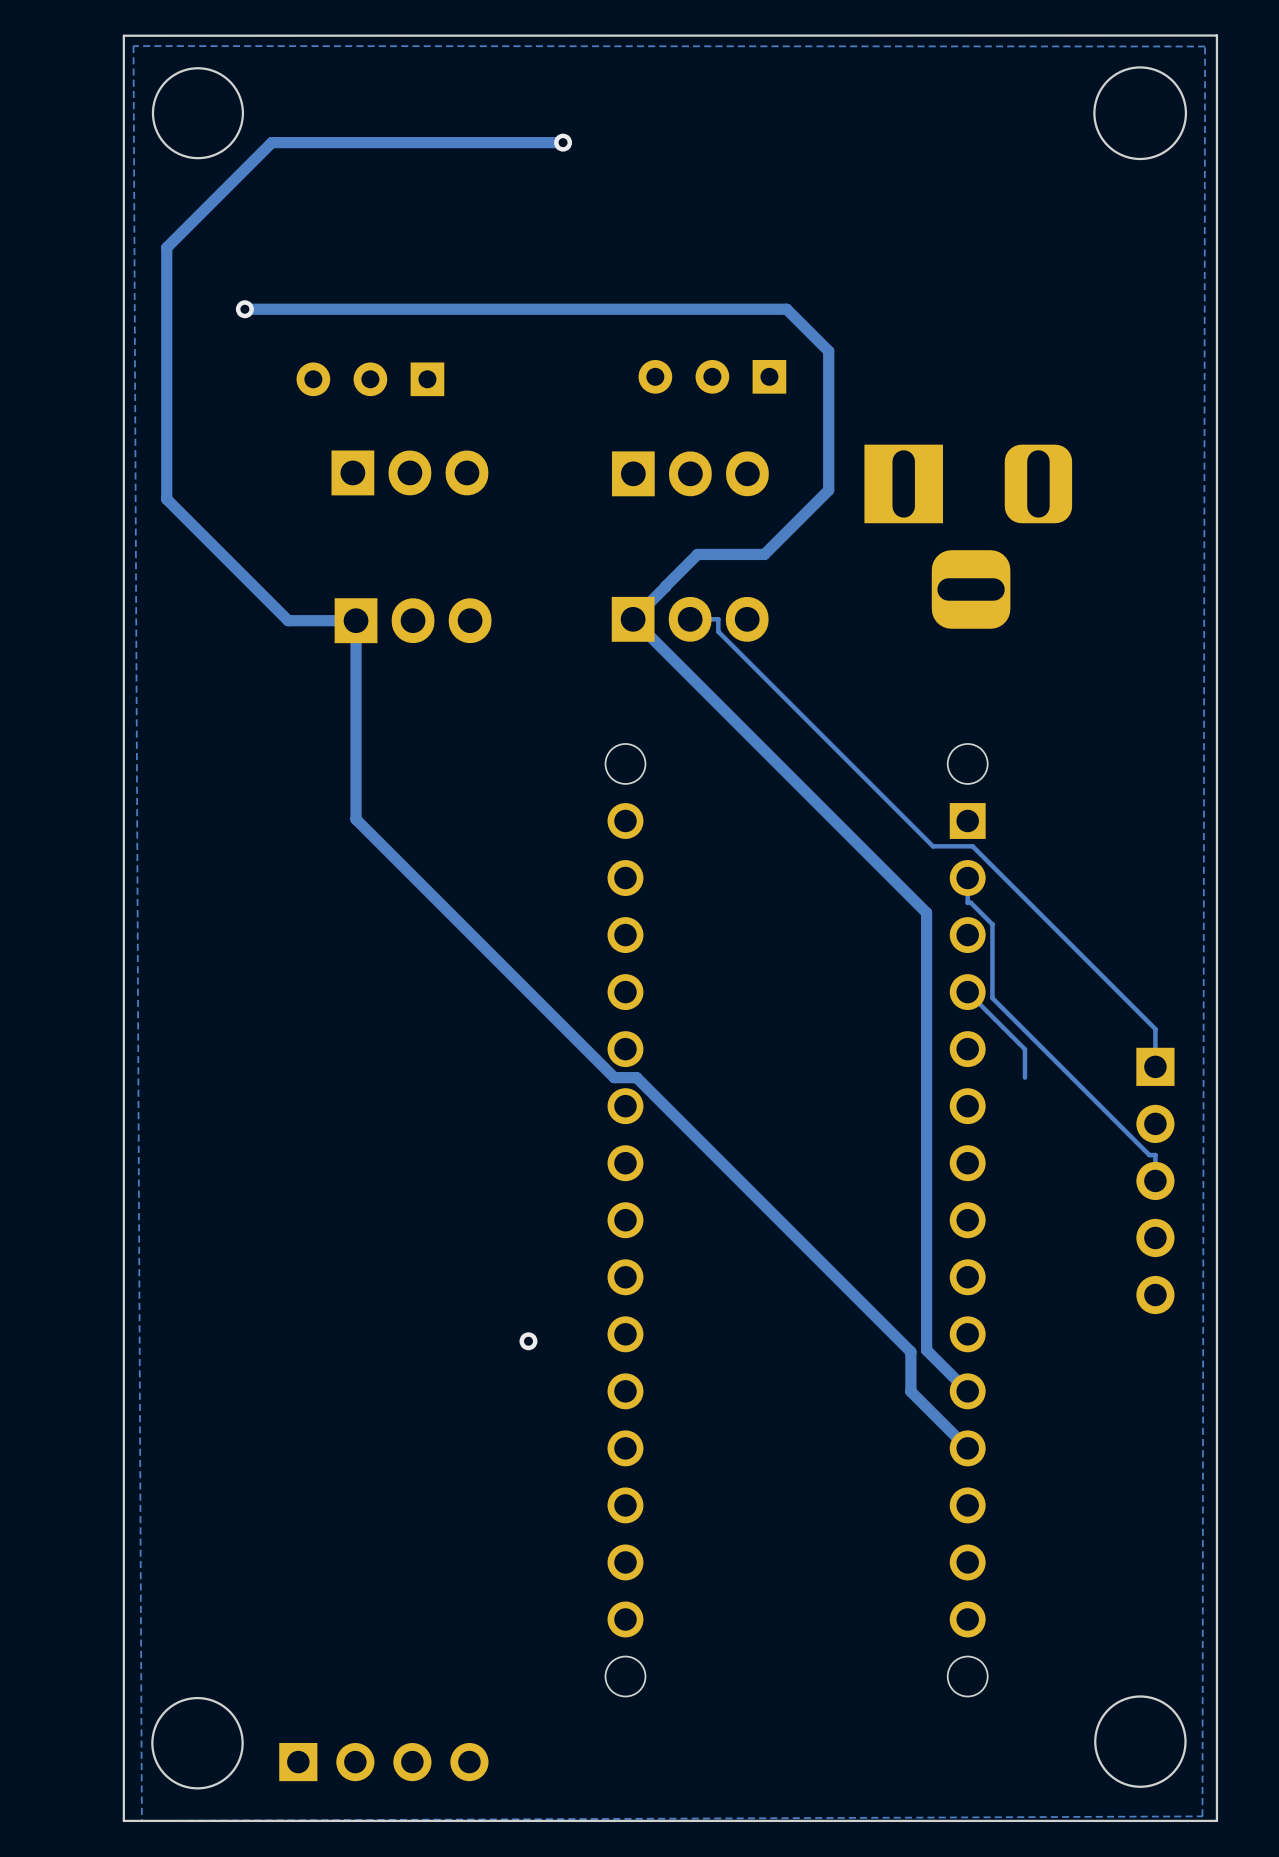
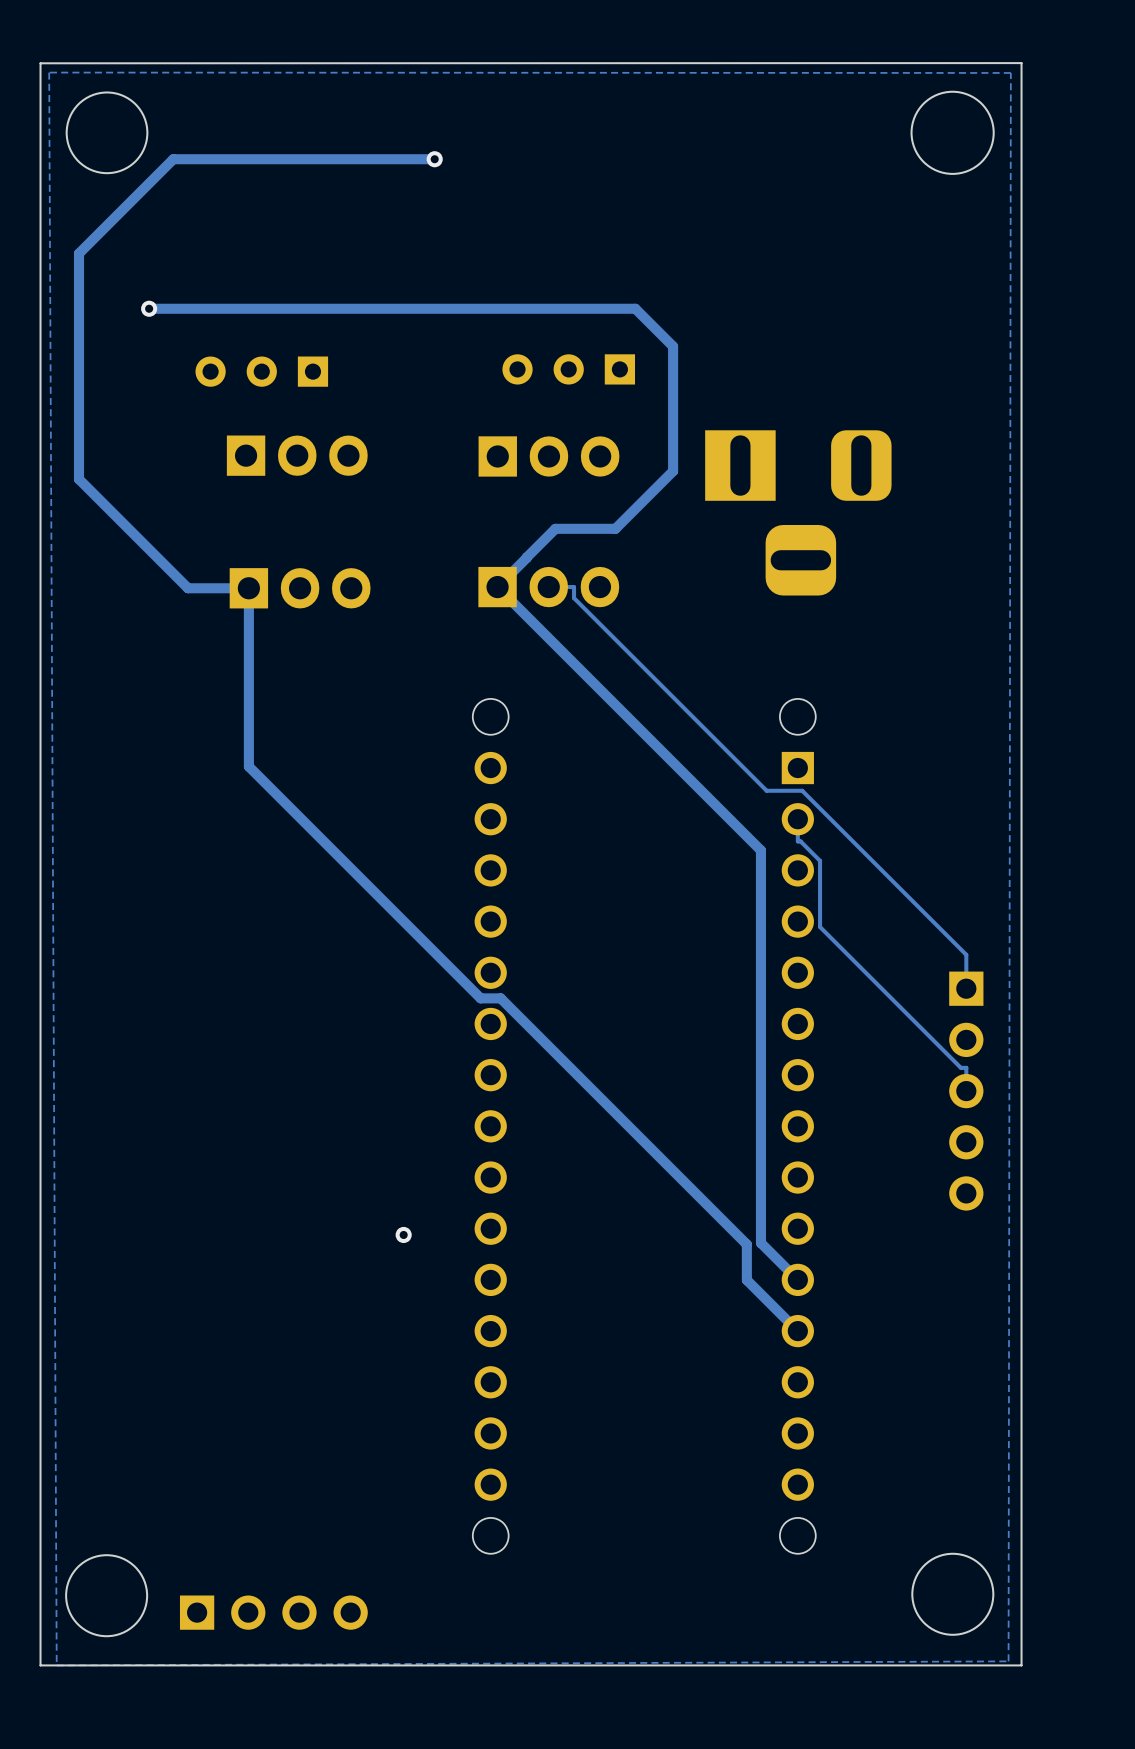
track: (967, 992) (1024, 1049) (1024, 1077) -> none

